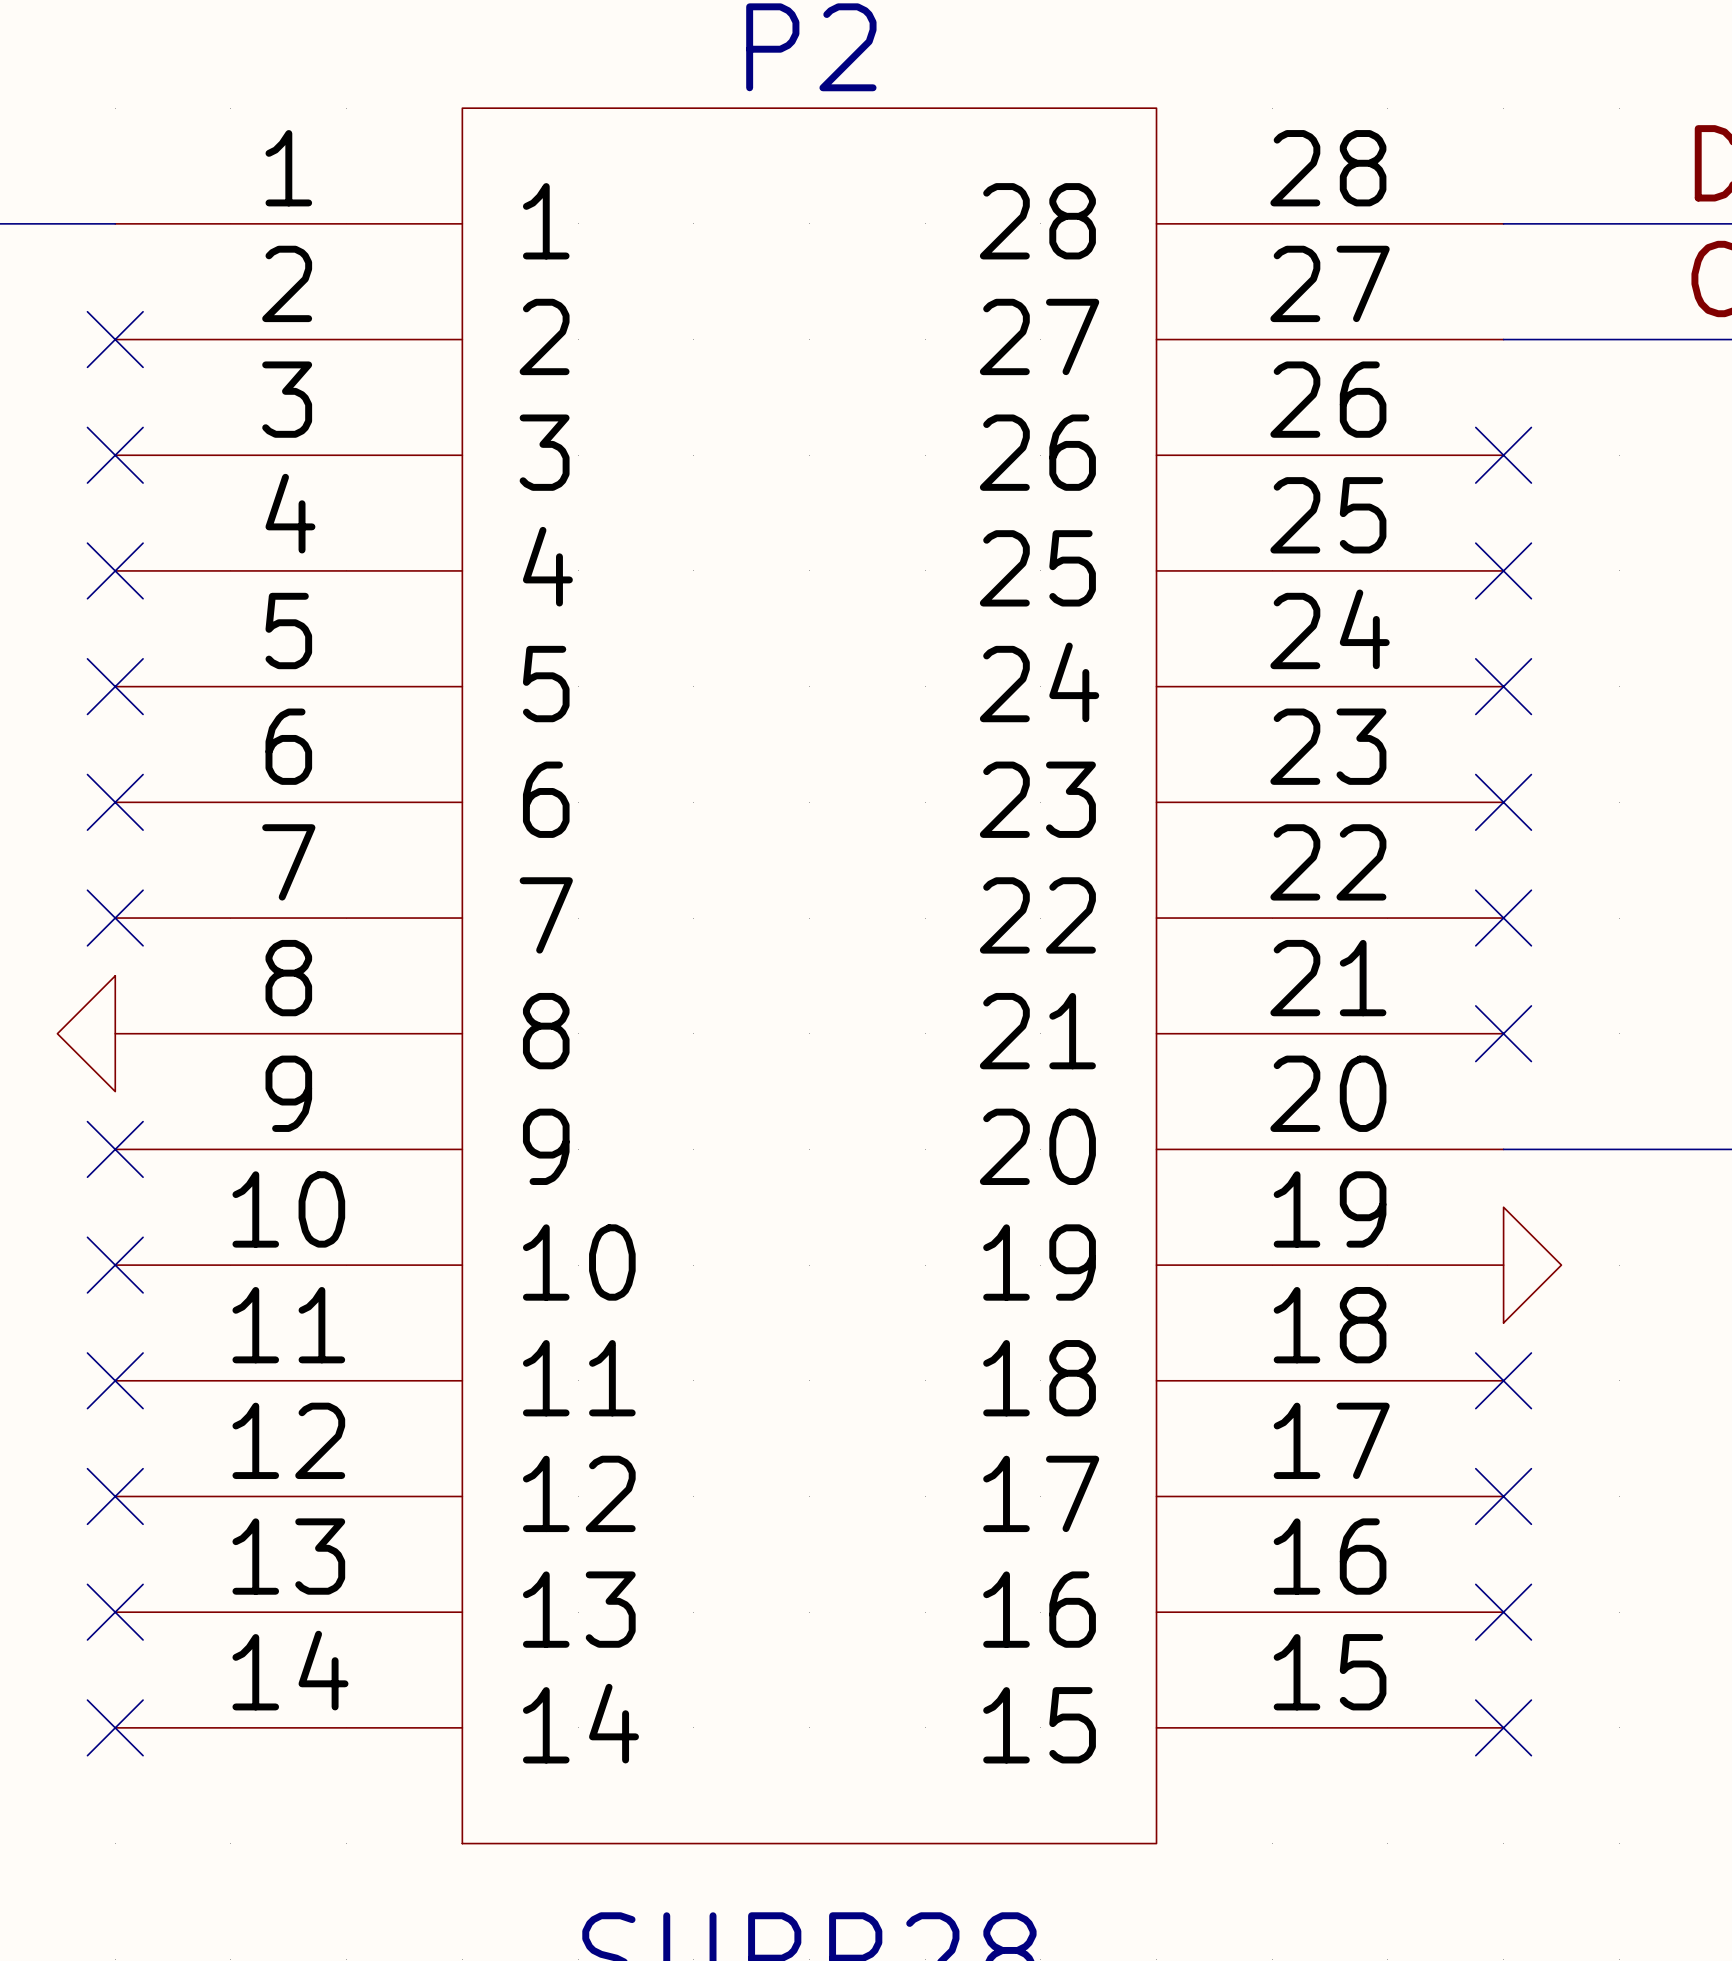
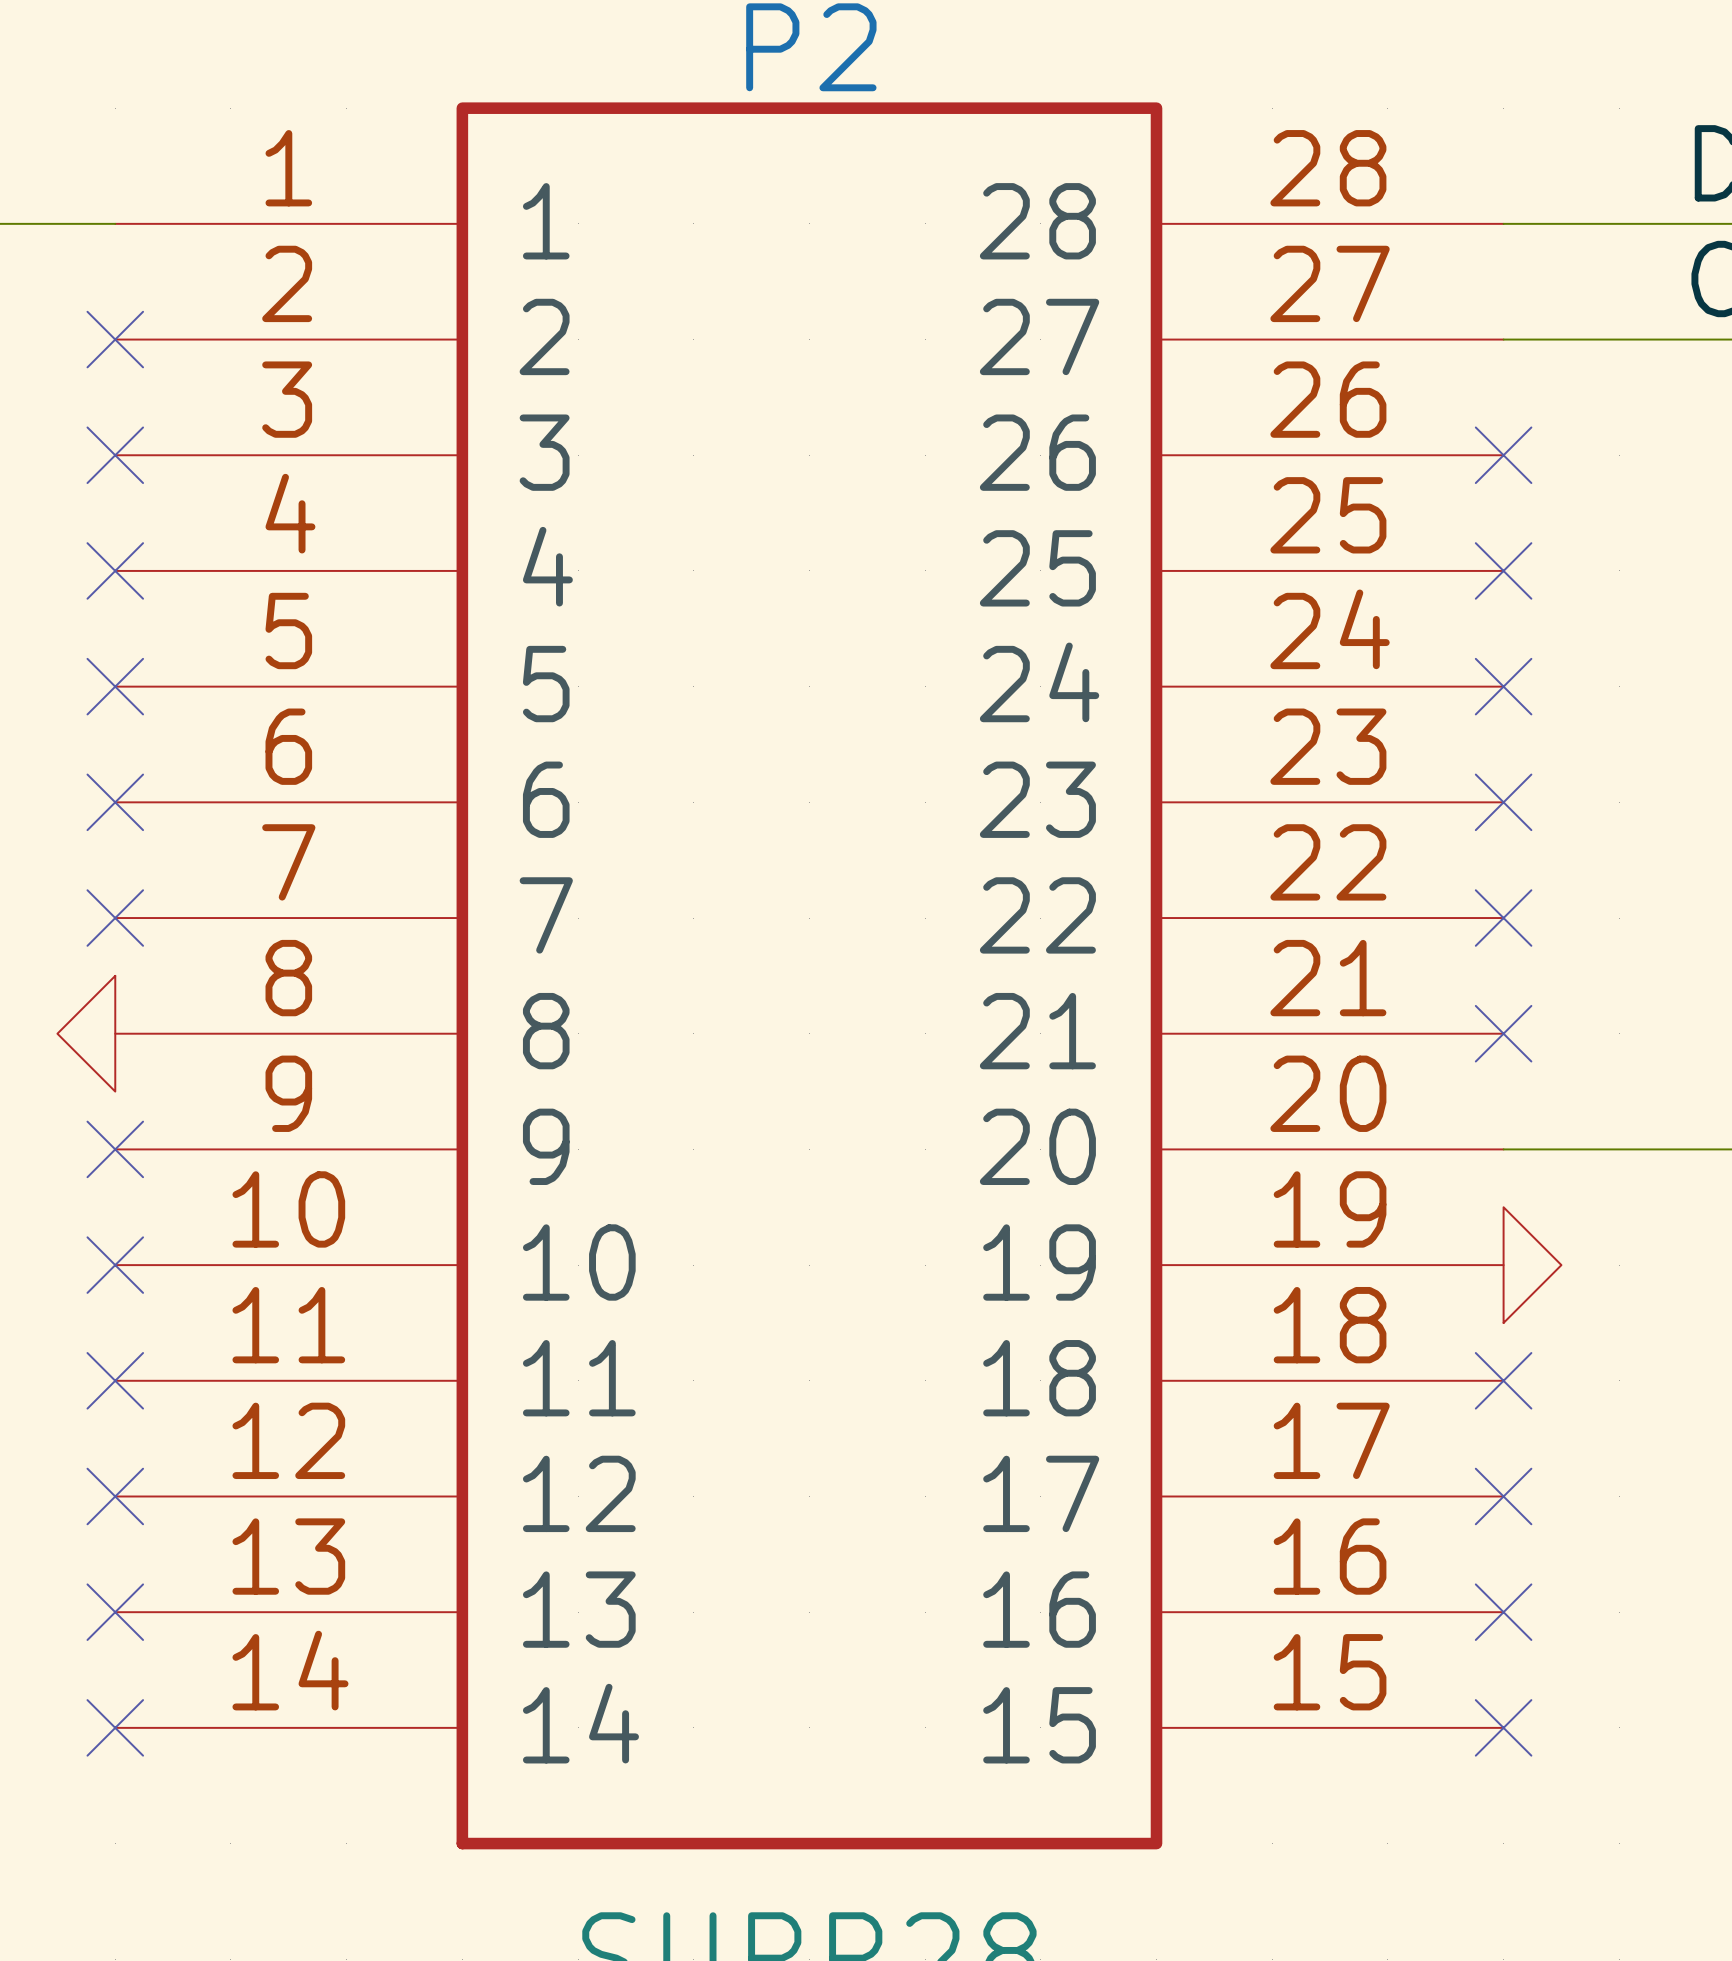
P2 symbol: [115, 108, 1504, 1844] -> [115, 102, 1504, 1850]

